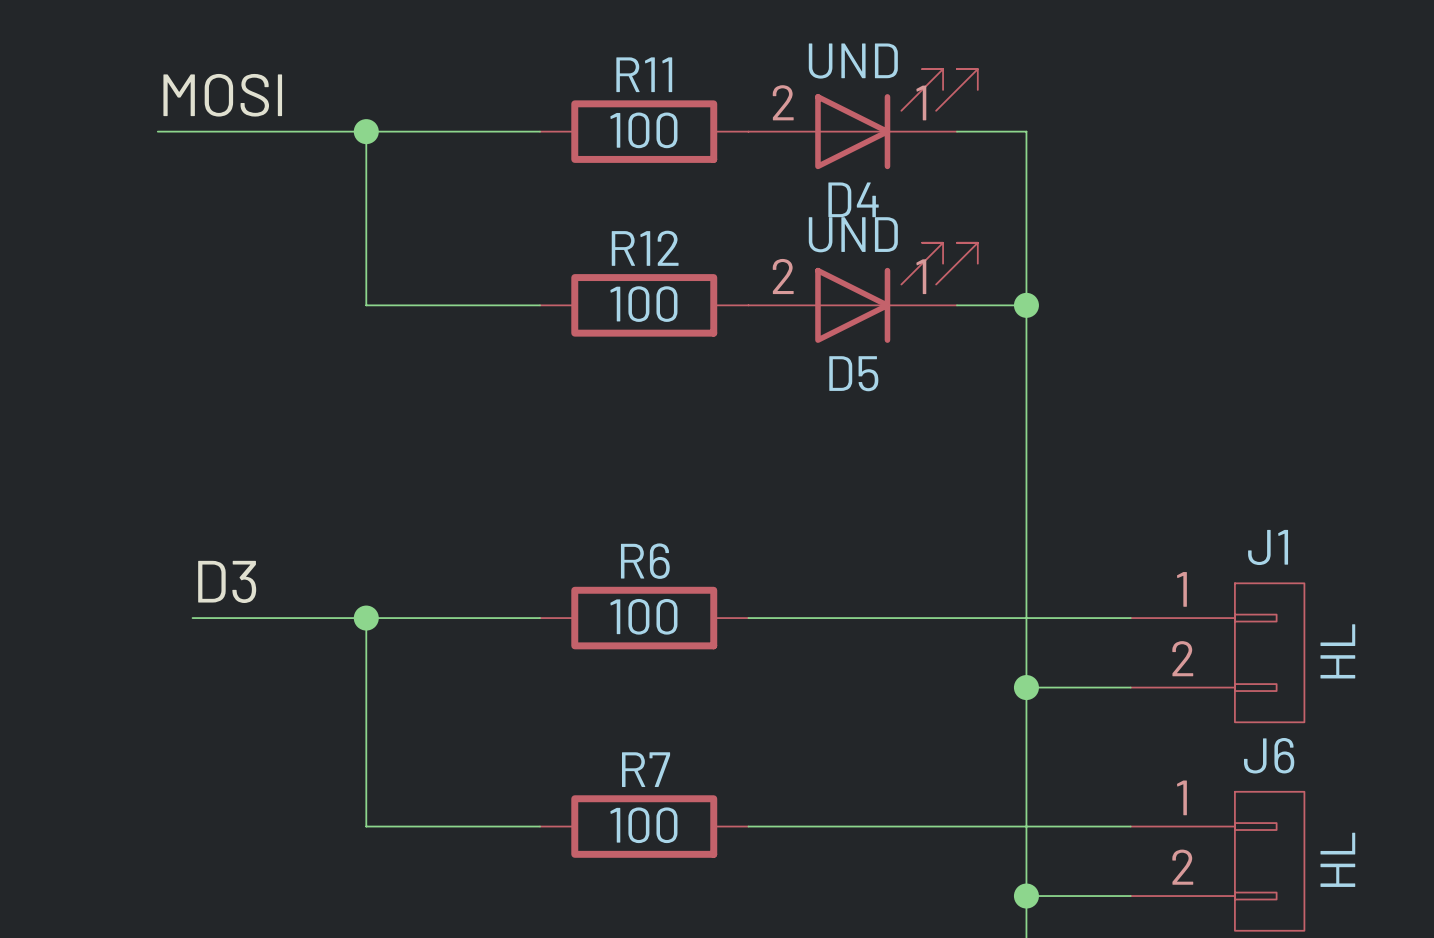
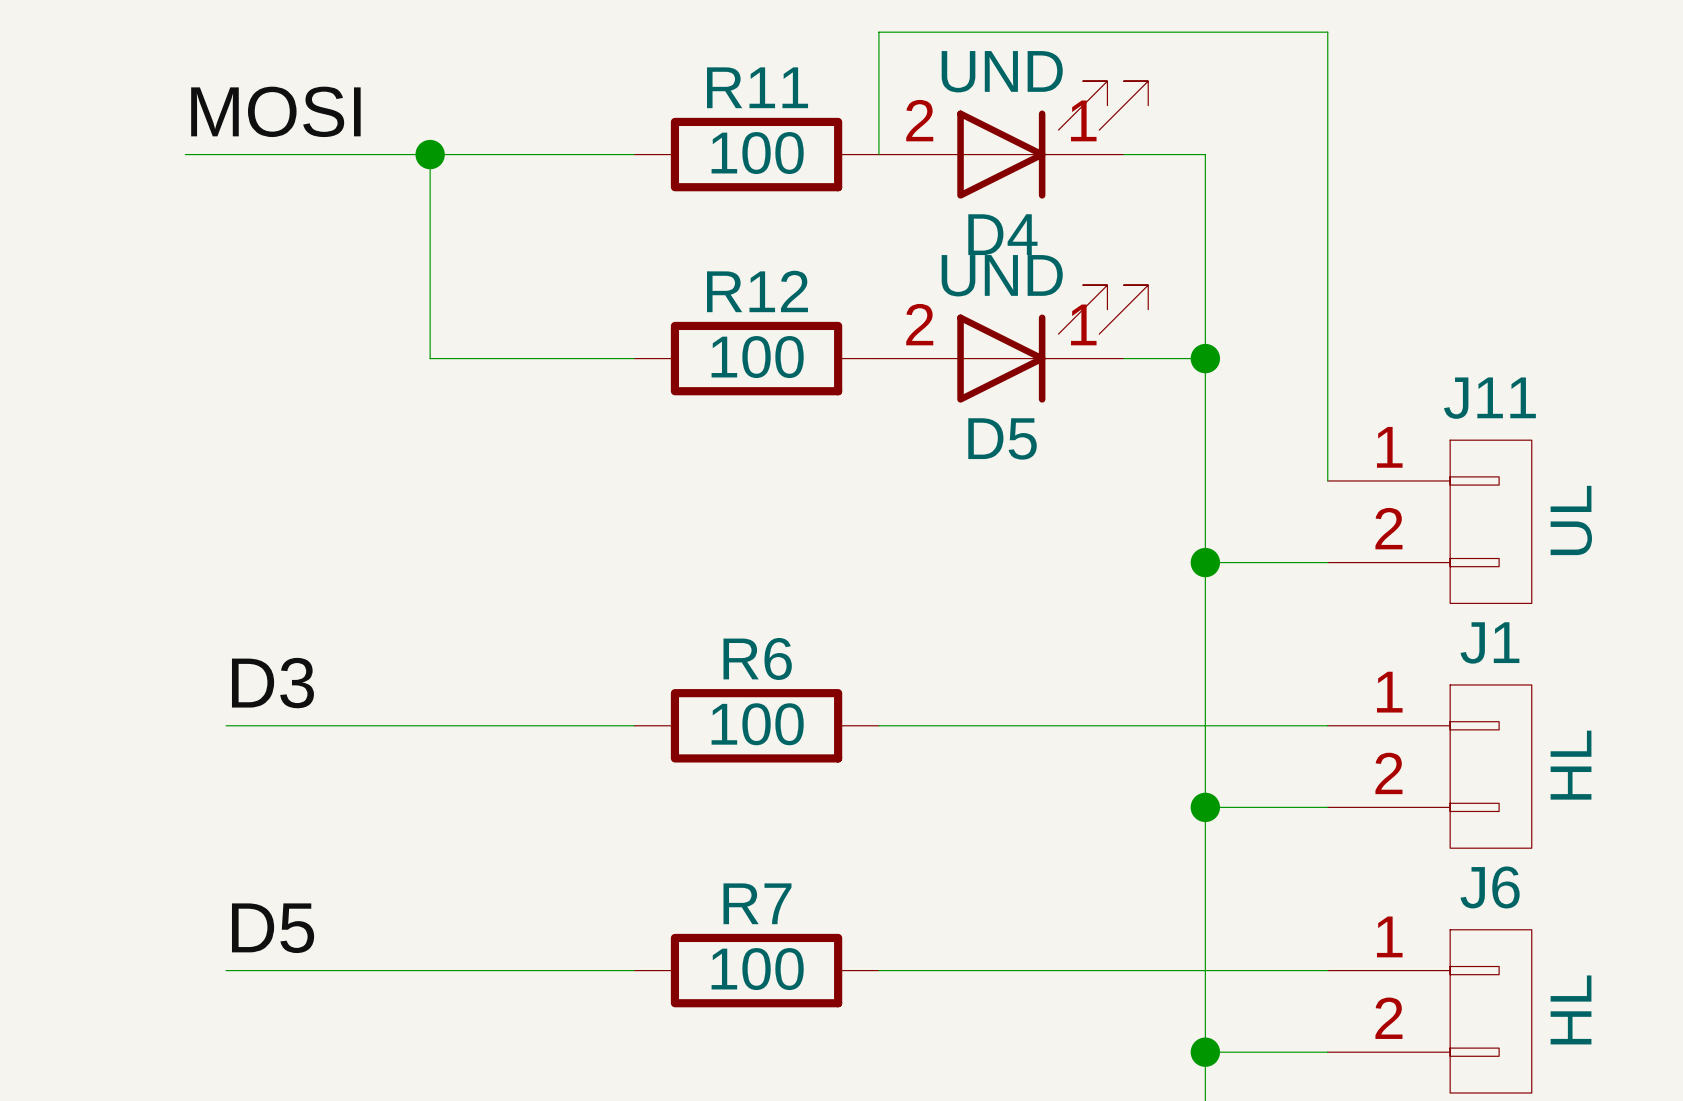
wire: none -> (878, 154) (878, 32) (1327, 32) (1327, 480)
J11: none -> UL (1429, 521)
wire: none -> (1205, 562) (1327, 562)
junction: none -> (1205, 562)
wire: (366, 618) (366, 826) -> (226, 970) (430, 970)
junction: (366, 618) -> none
label: none -> D5 (273, 928)

